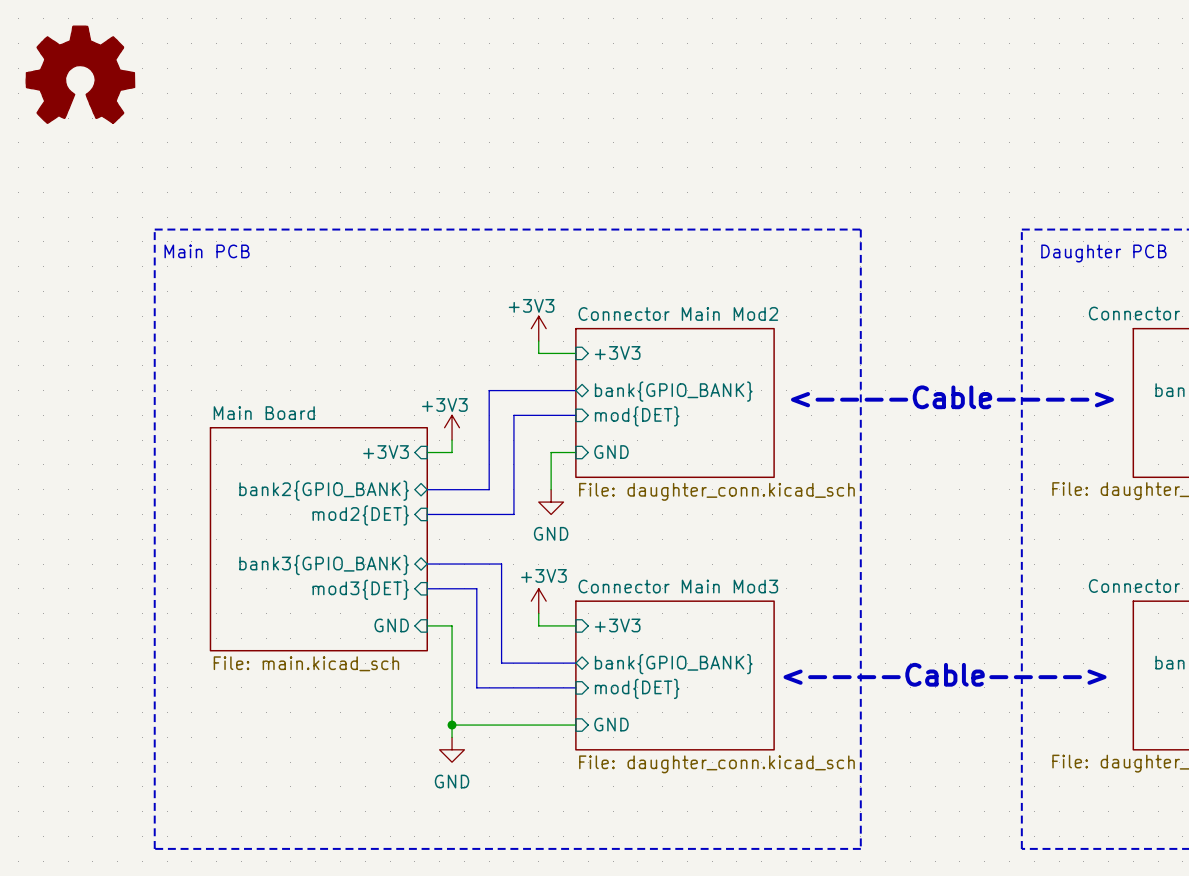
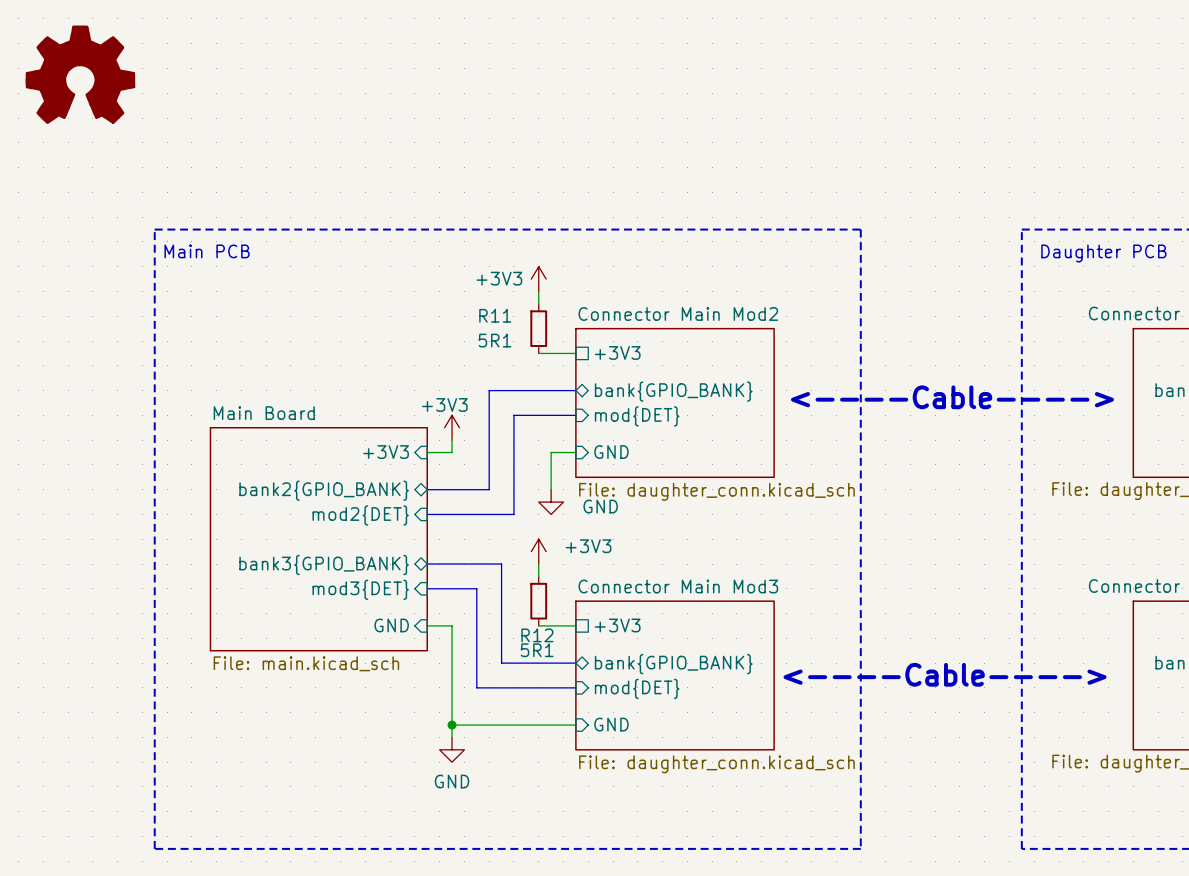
power symbol text position: +3V3 (531, 305) -> +3V3 (499, 278)
power symbol position: +3V3 (538, 328) -> +3V3 (538, 279)
R11: none -> 5R1 (538, 328)
sheet pin shape: input (617, 352) -> passive (617, 352)
power symbol text position: GND (551, 533) -> GND (600, 506)
power symbol text position: +3V3 (543, 575) -> +3V3 (588, 546)
power symbol position: +3V3 (538, 601) -> +3V3 (538, 551)
R12: none -> 5R1 (538, 601)
sheet pin shape: input (617, 625) -> passive (617, 625)

